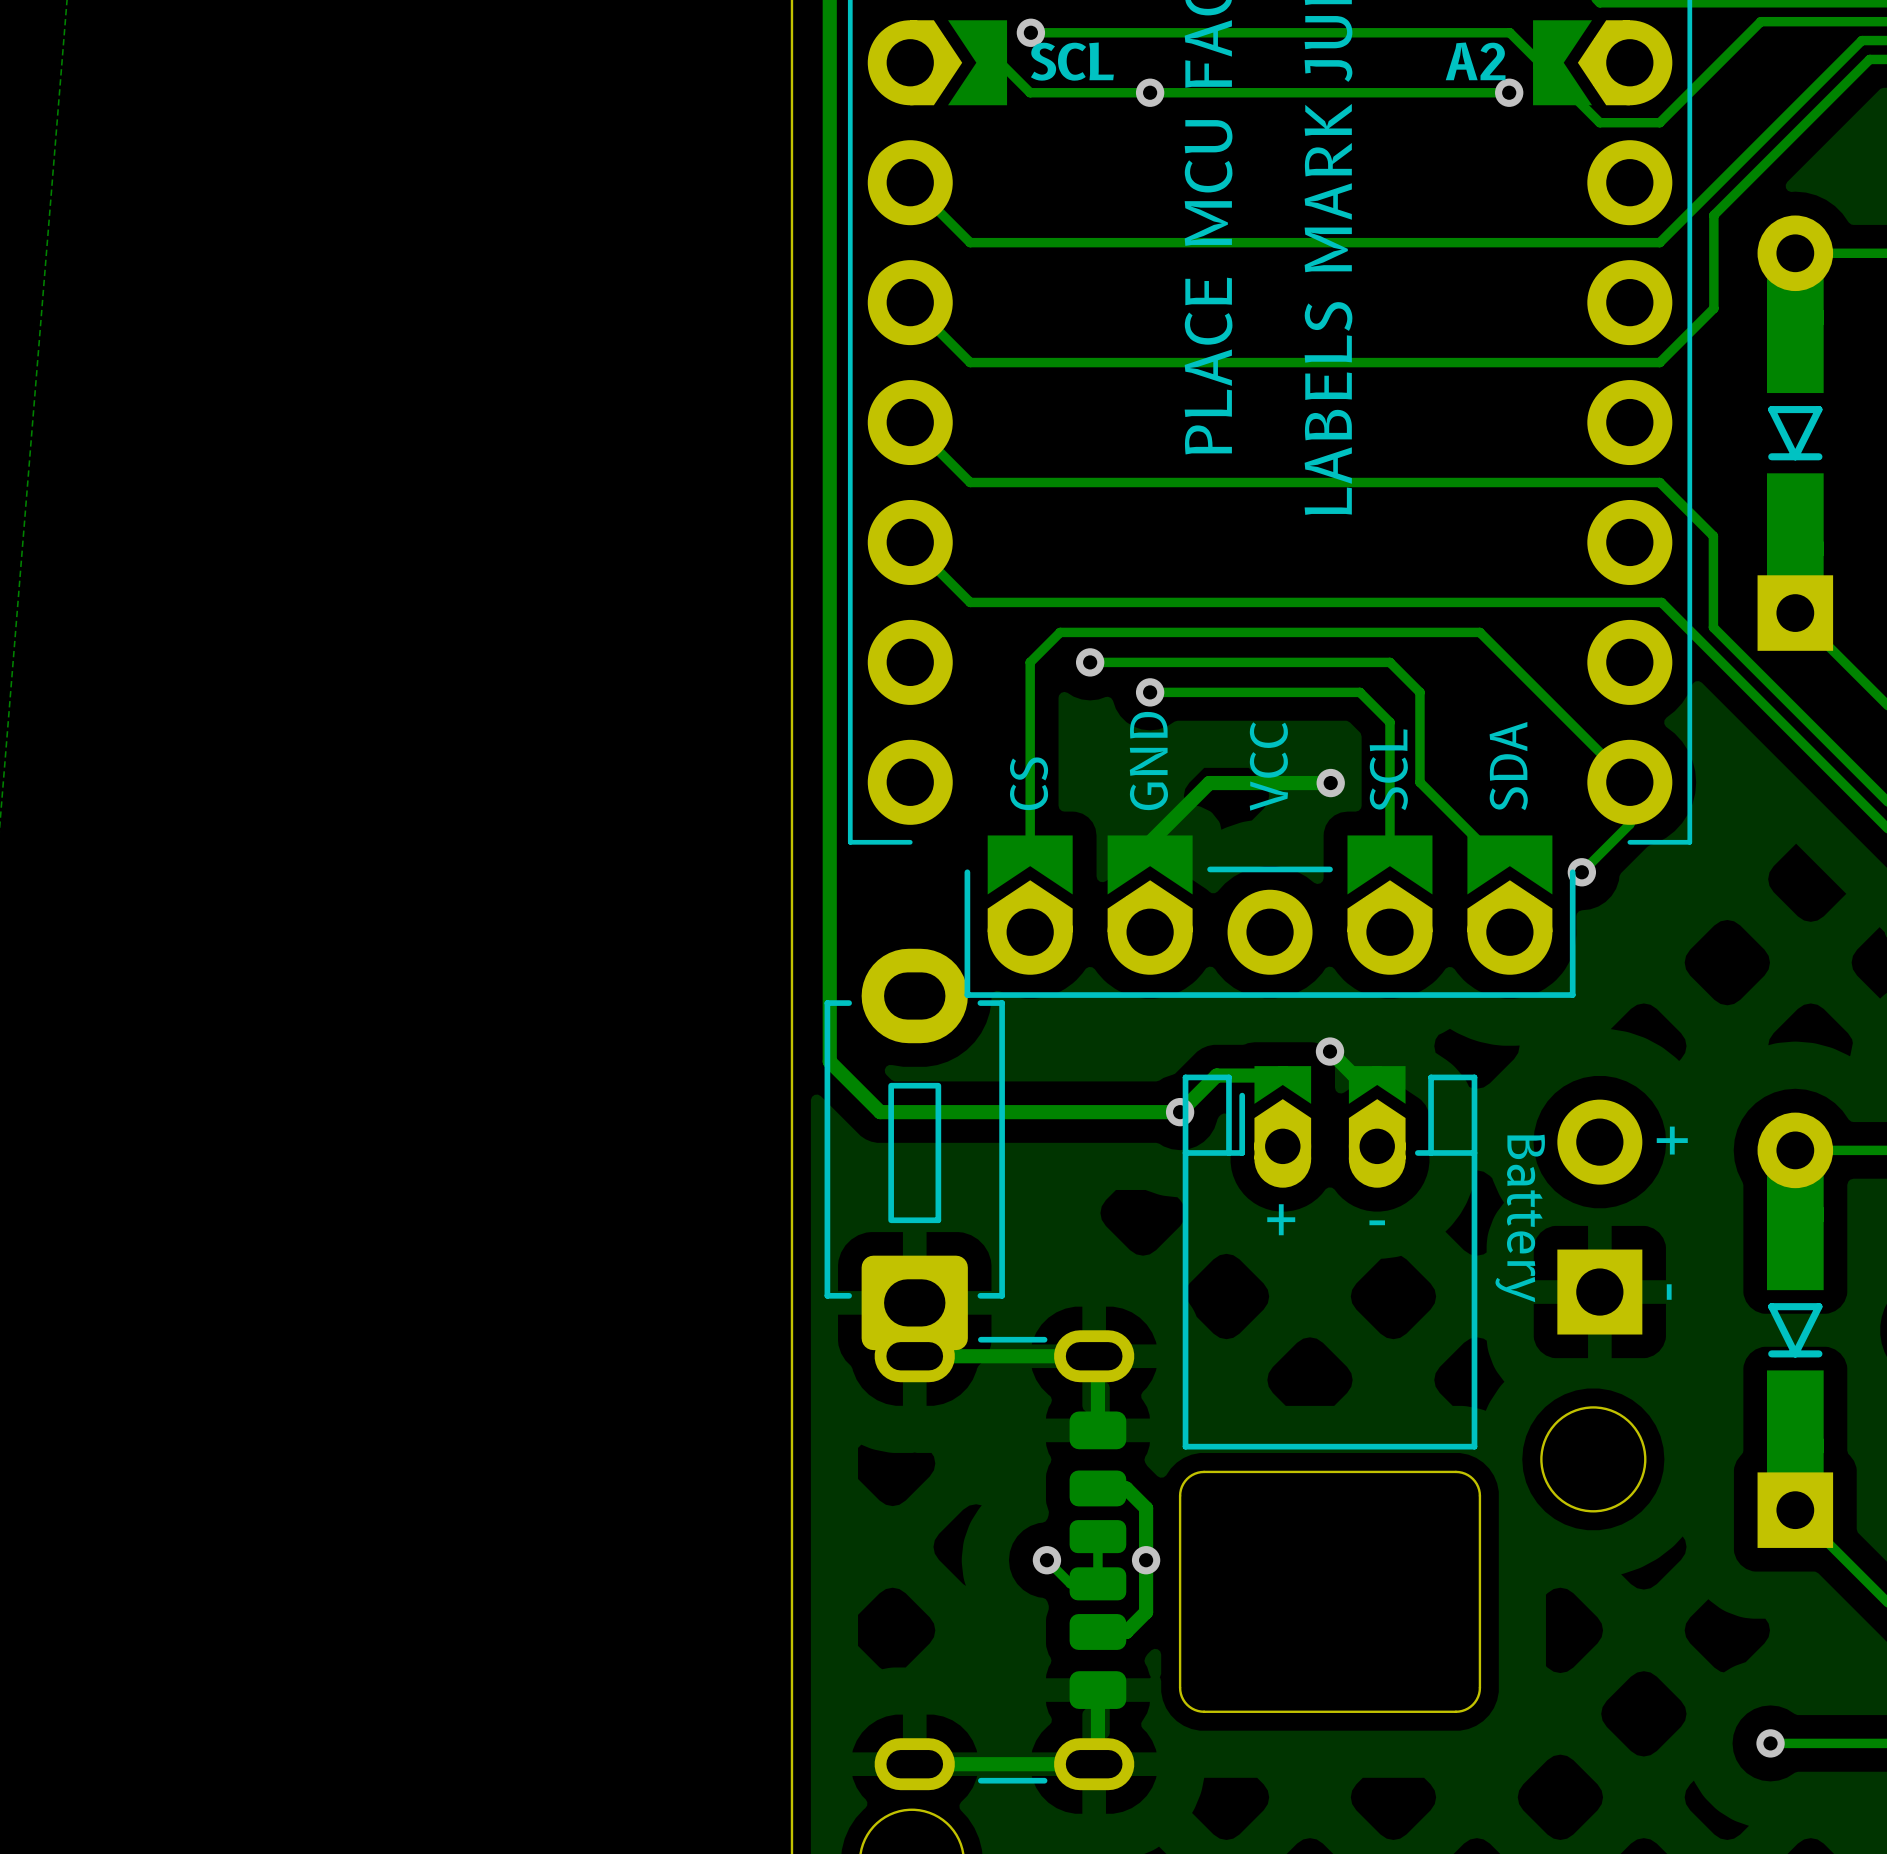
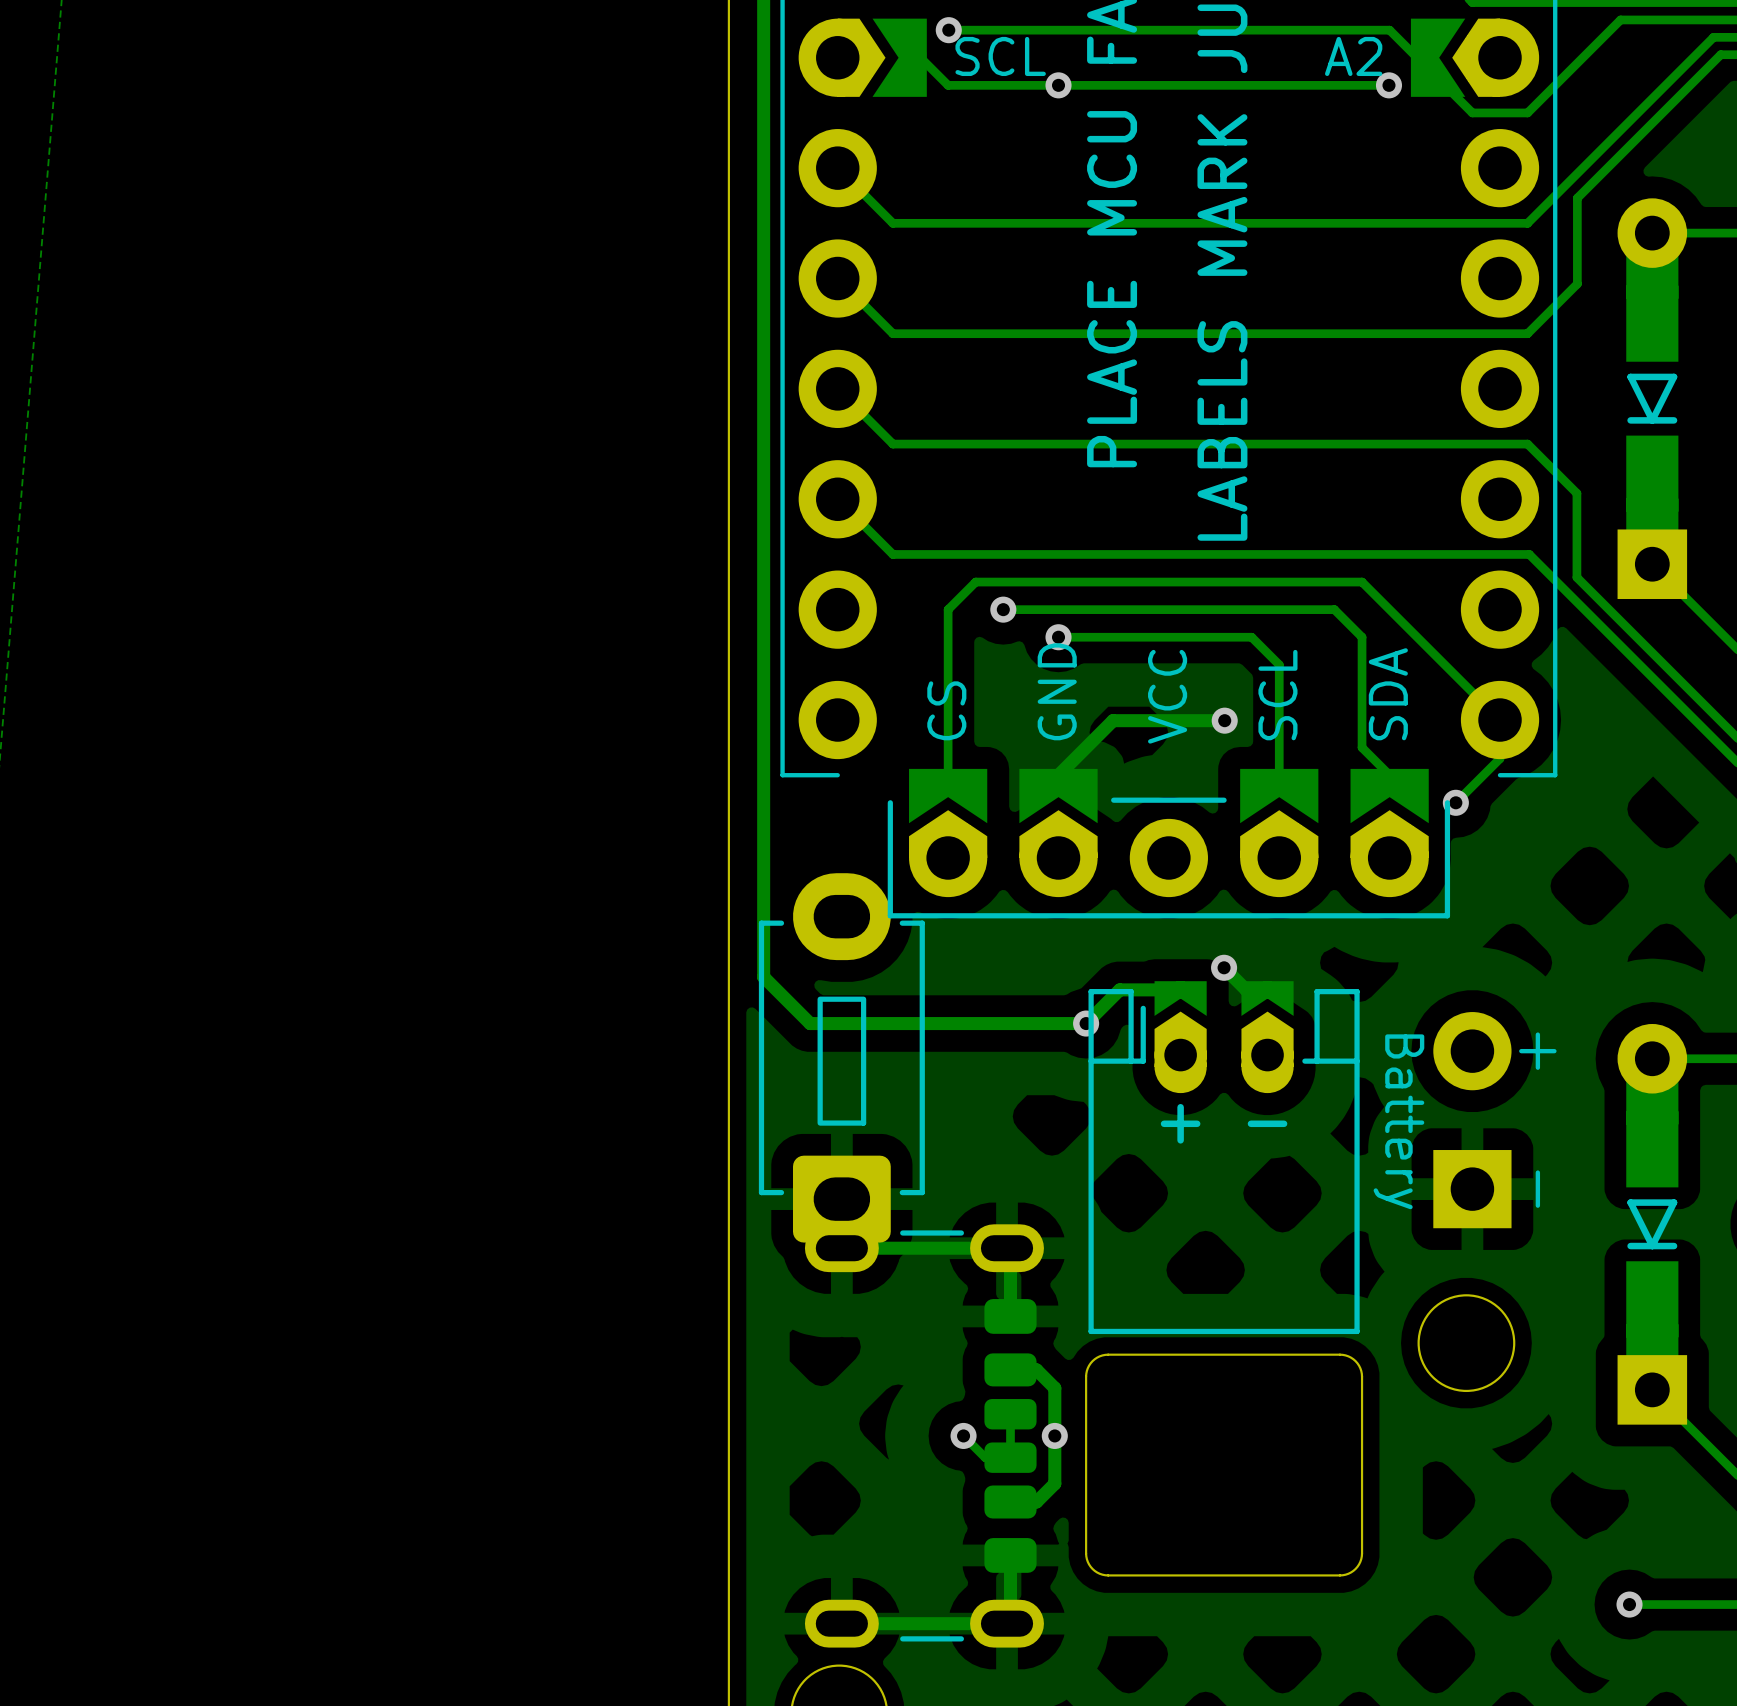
track: (1389, 662) (1419, 692) (1419, 782) (1479, 842) (1509, 842) -> (1279, 609) (1334, 609) (1362, 637) (1362, 747) (1389, 775)

